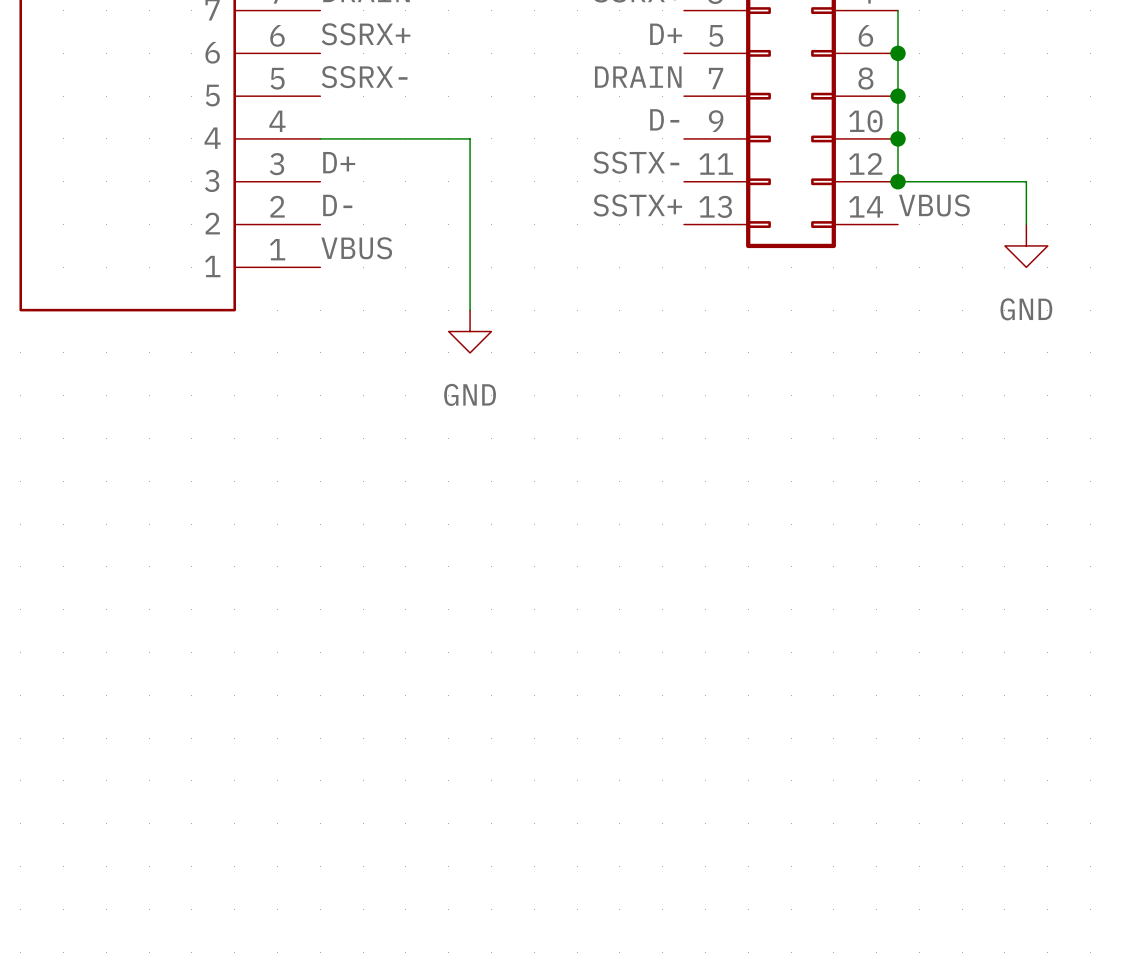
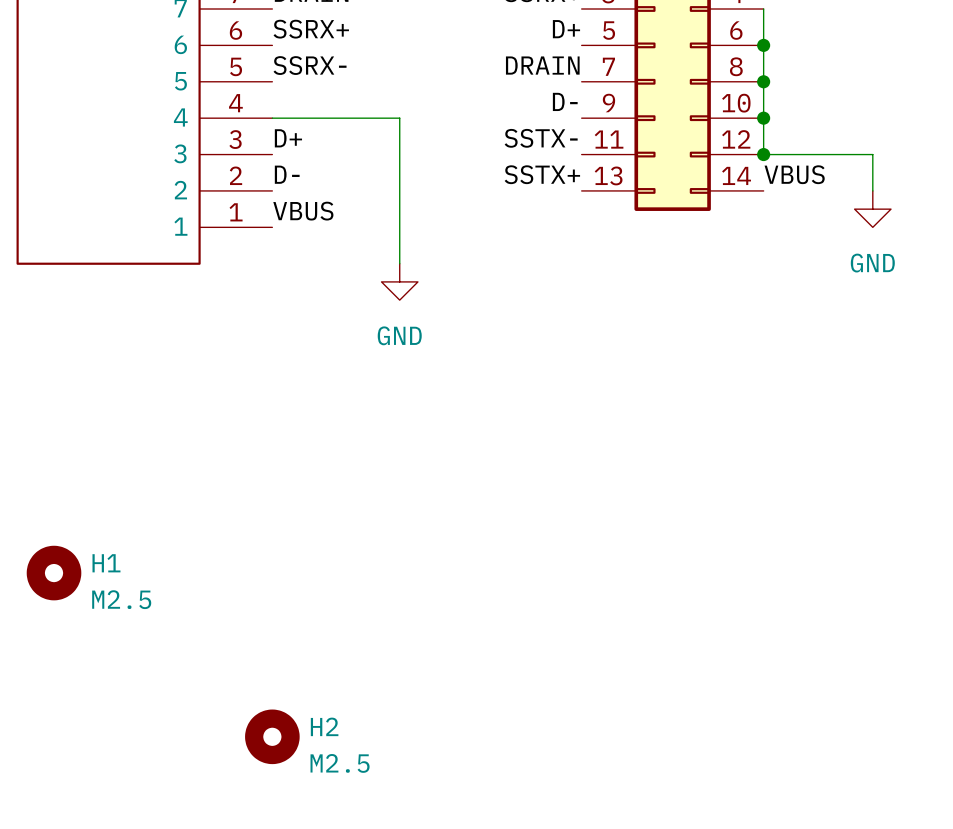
H1: none -> M2.5 (54, 573)
H2: none -> M2.5 (272, 736)

